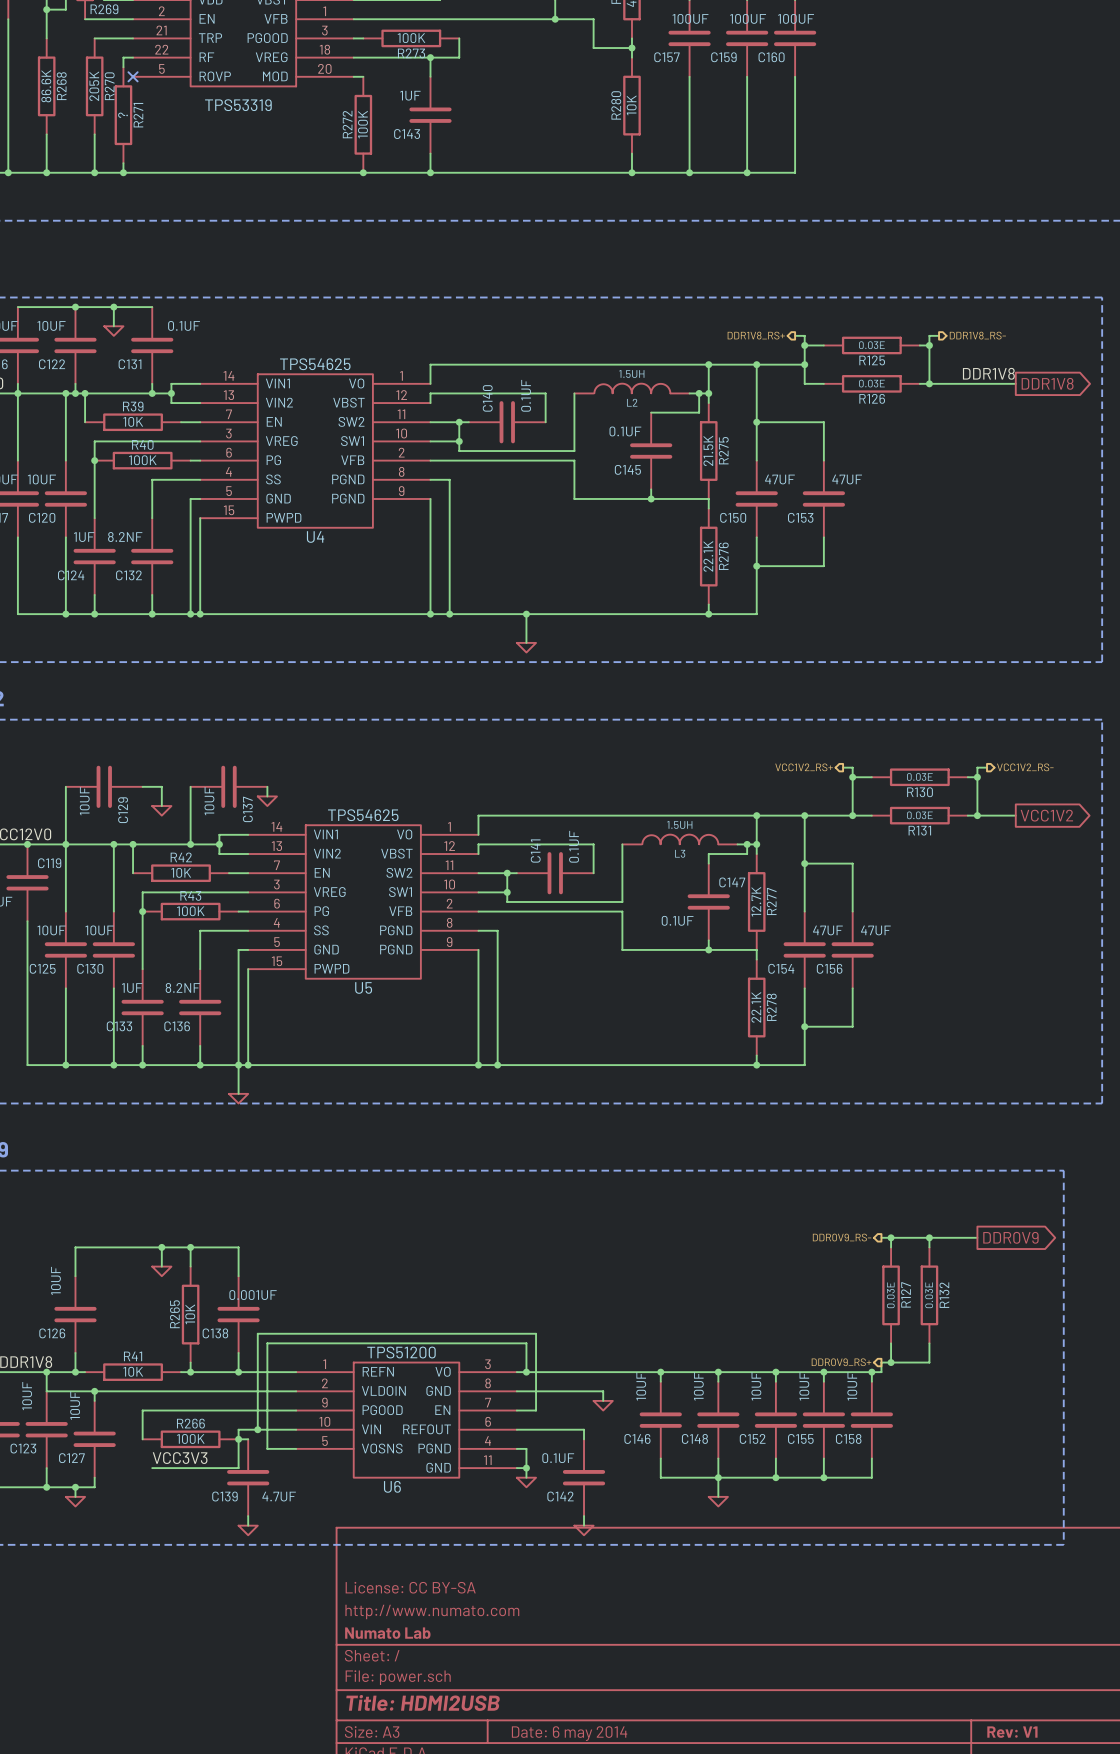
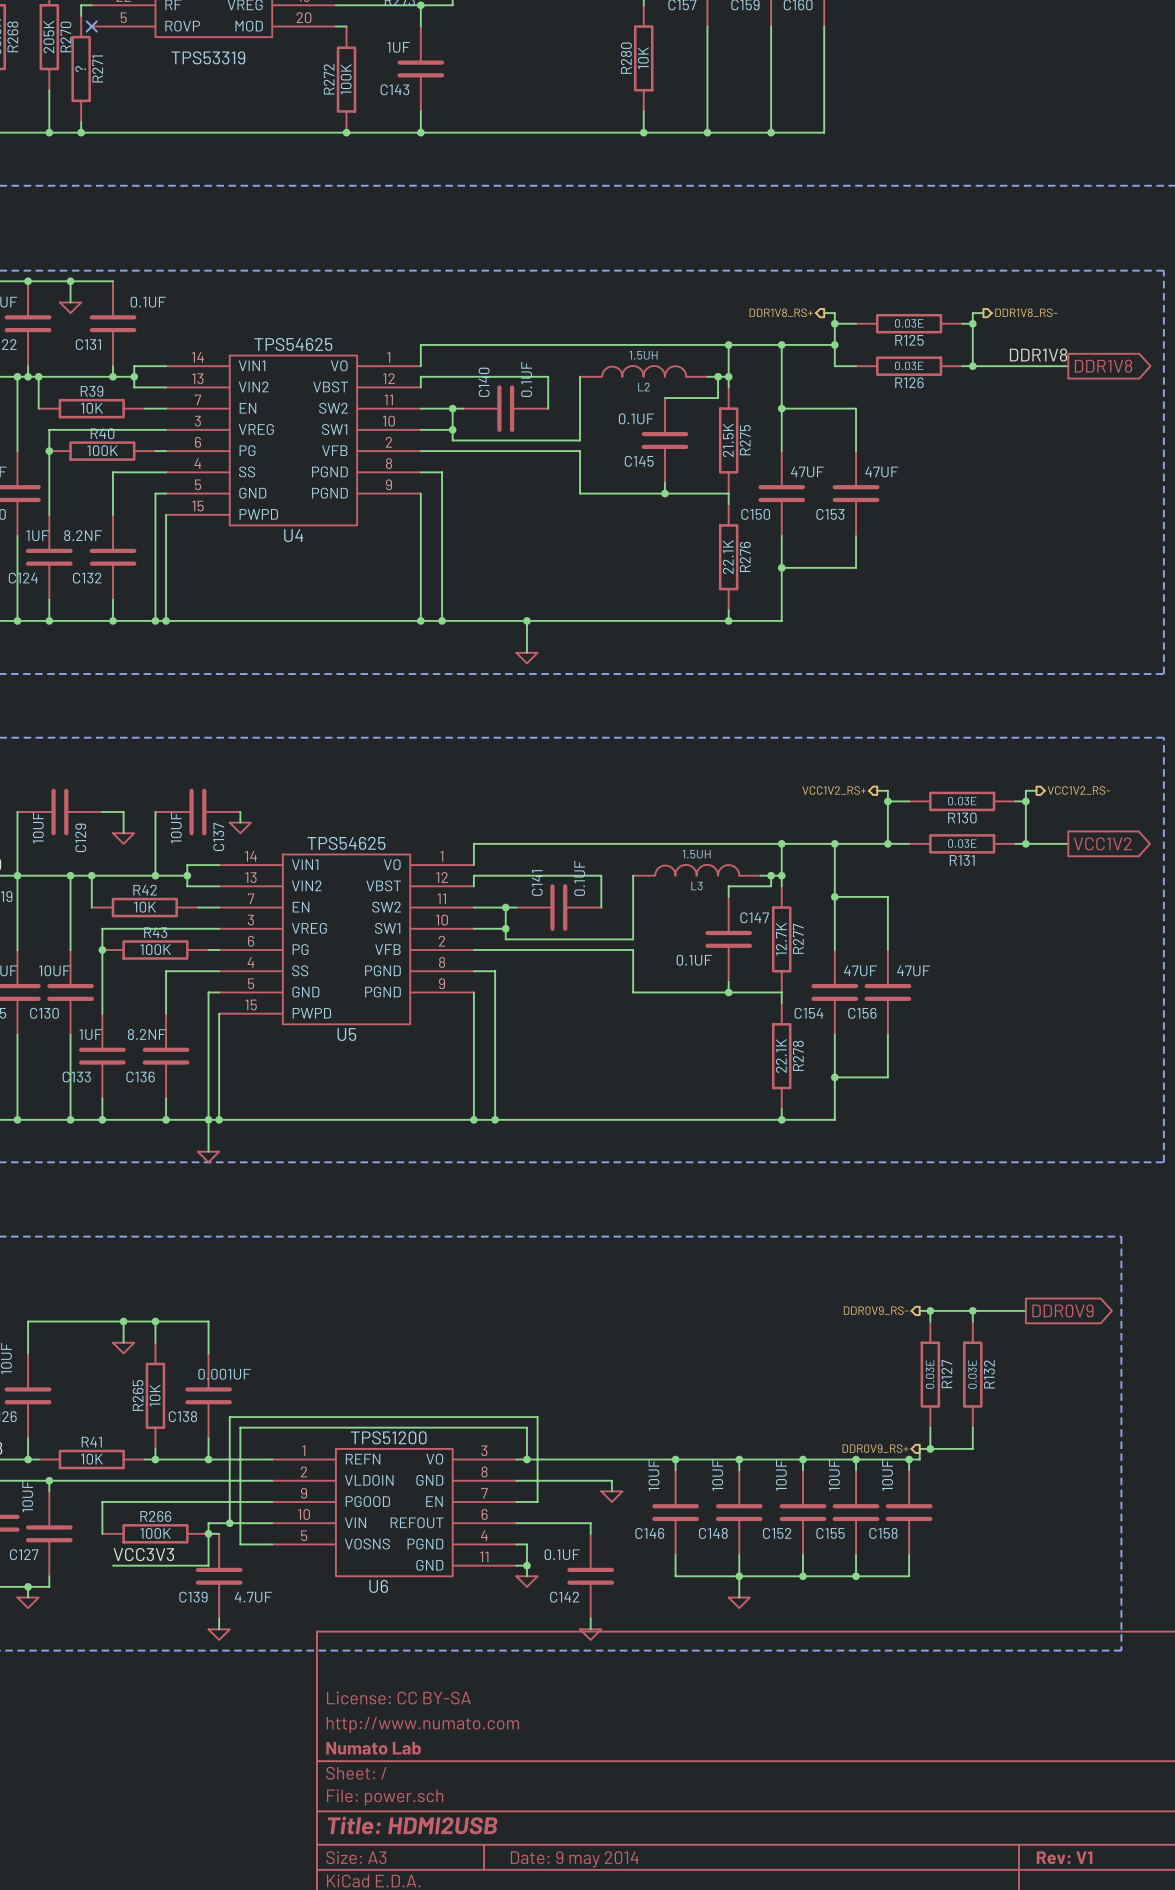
title block: Date: 6 may 2014 (569, 1733) -> Date: 9 may 2014 (574, 1859)

